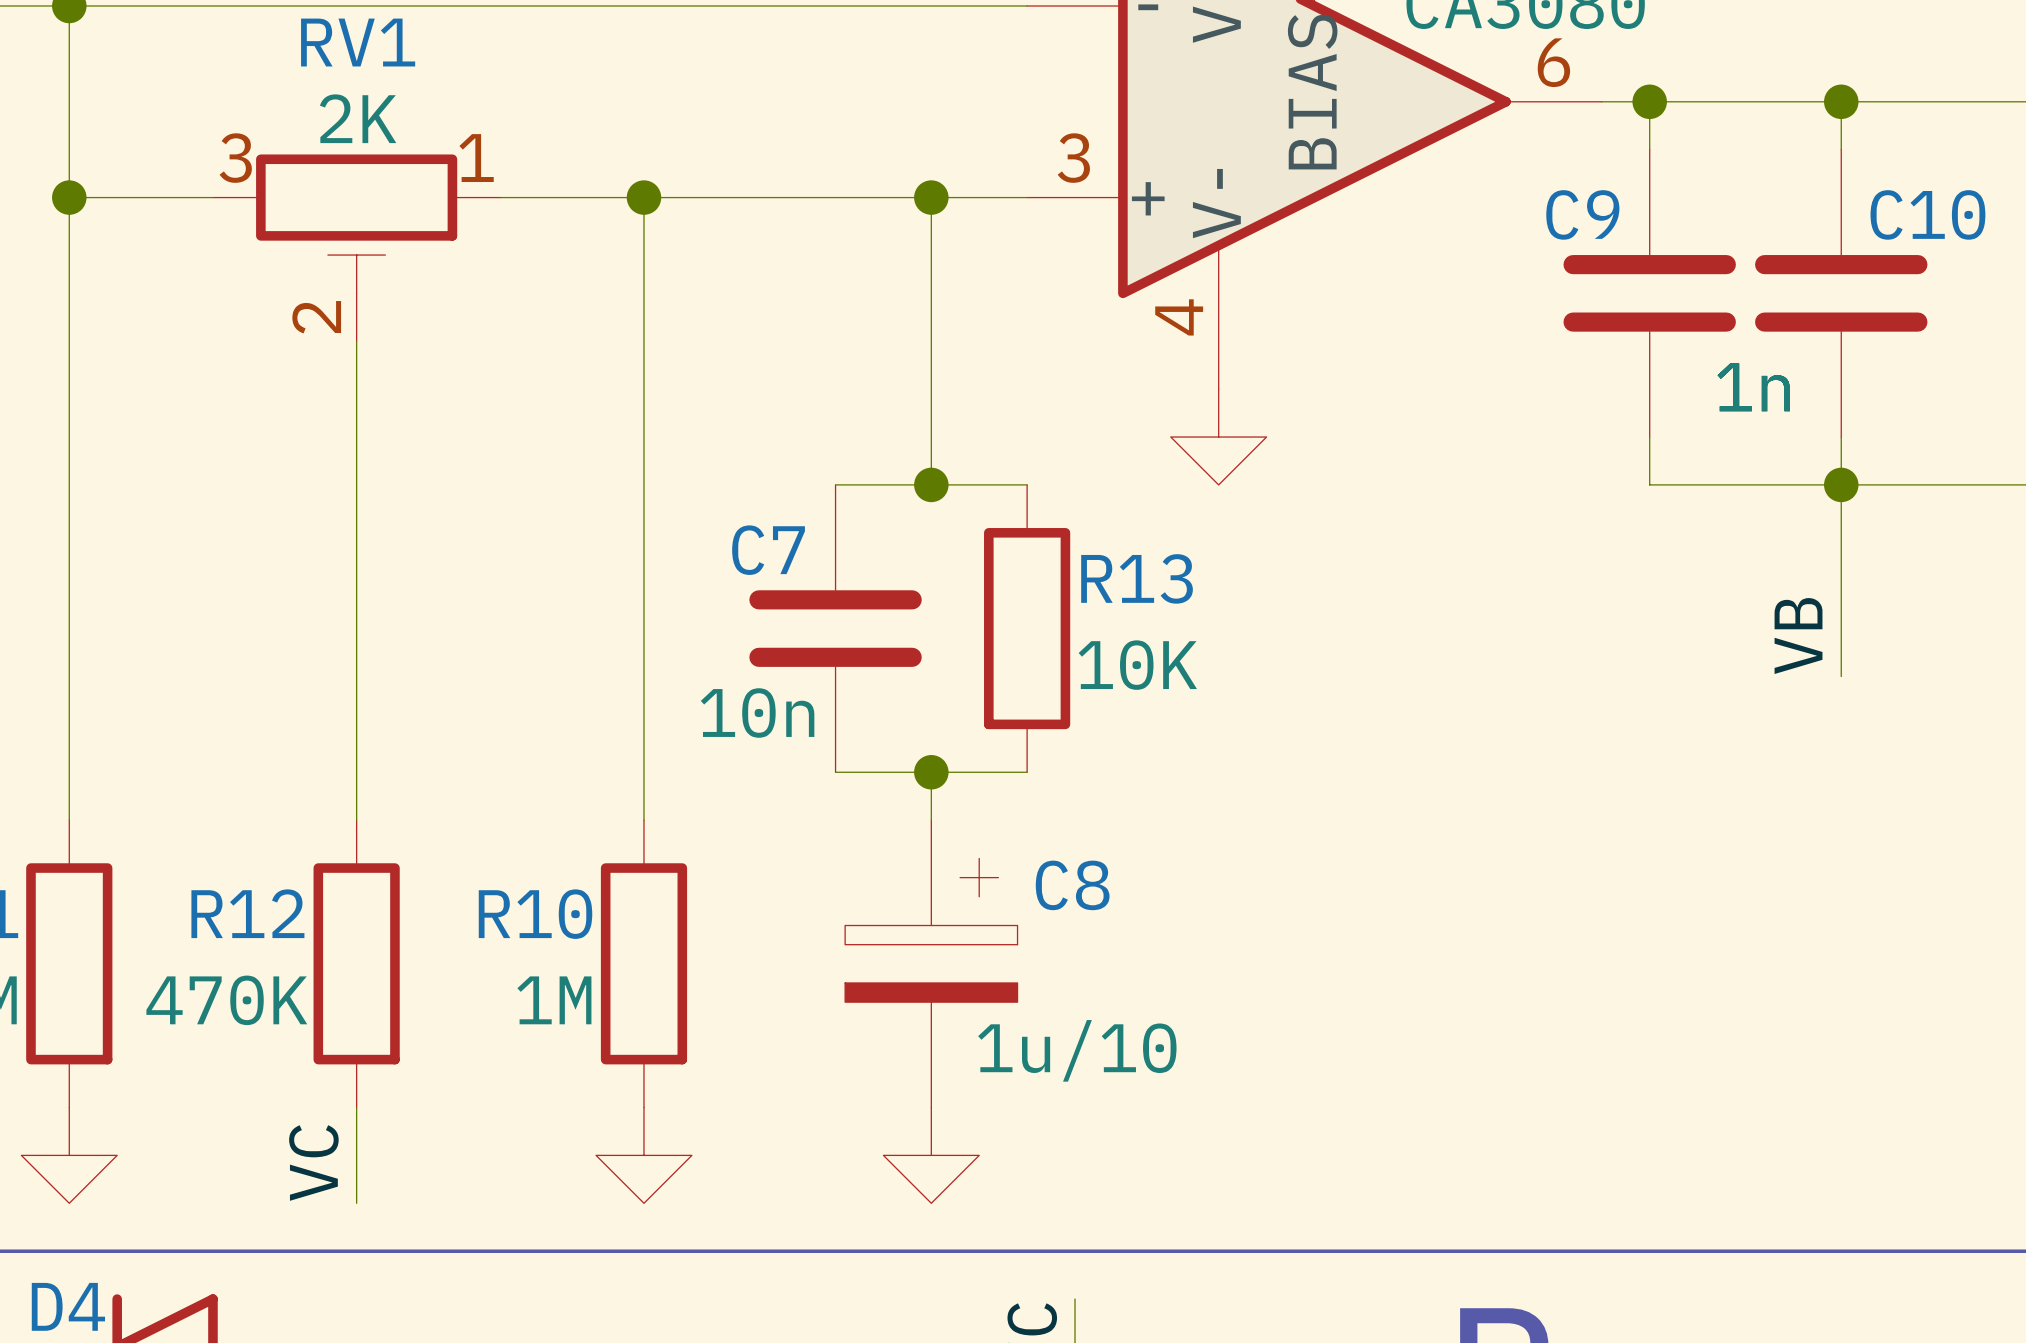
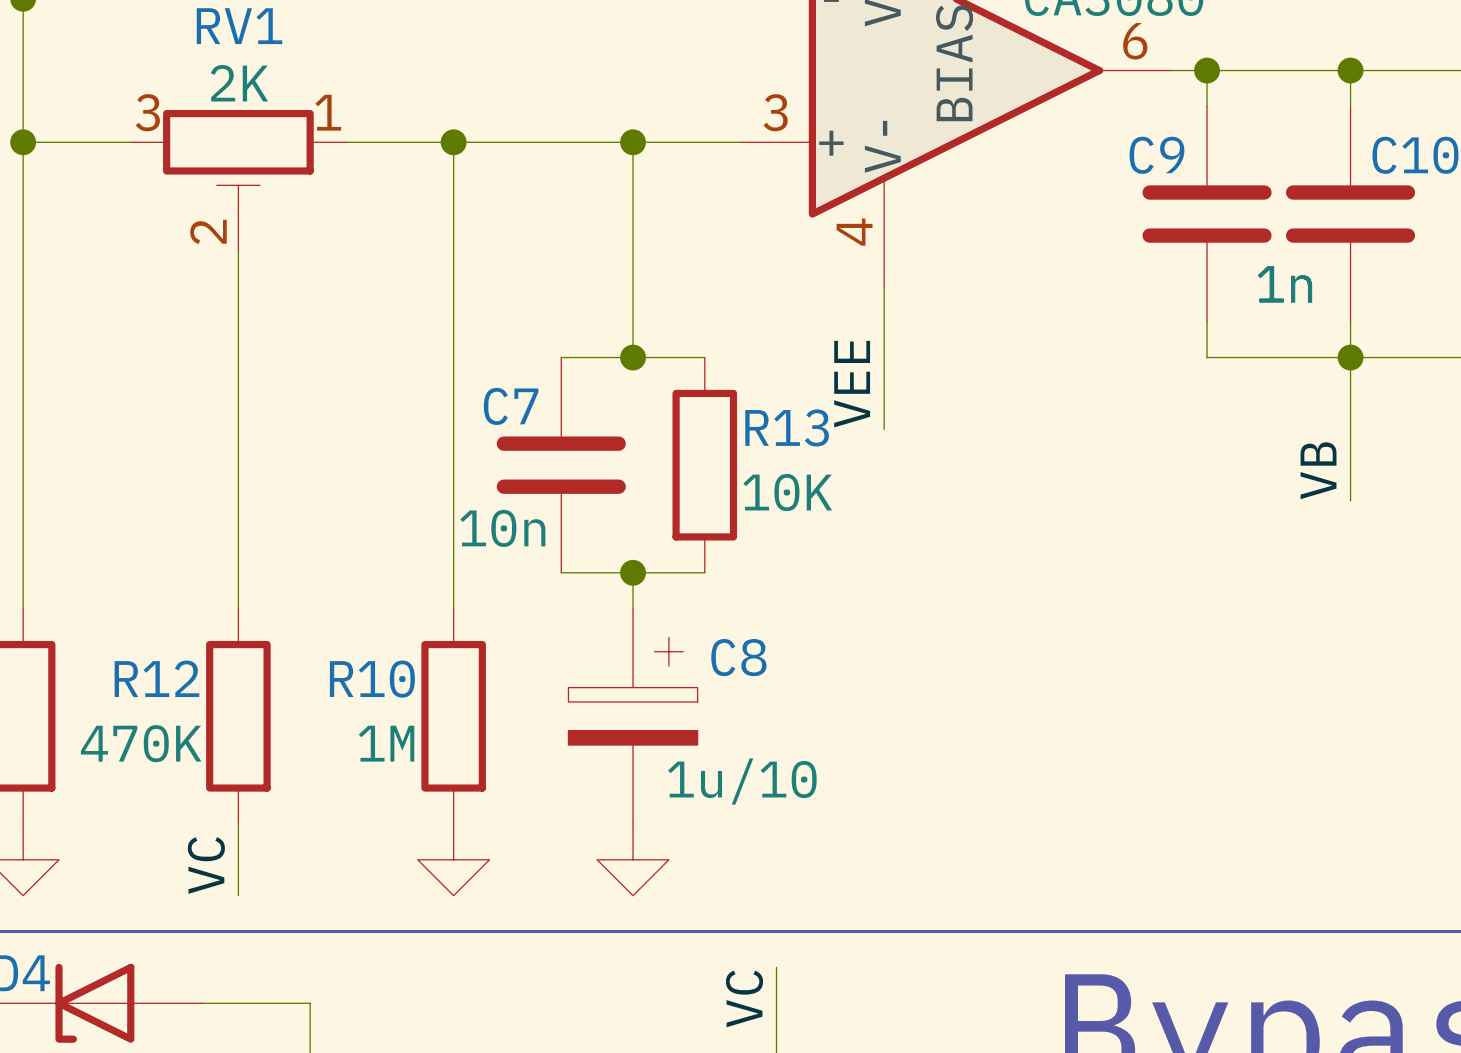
wire: (931, 197) (931, 484) -> (633, 142) (633, 357)
junction position: (931, 197) -> (633, 142)
wire: none -> (884, 285) (884, 429)
power symbol: (1218, 437) -> none
junction position: (931, 484) -> (633, 357)
wire: (979, 484) (1027, 484) -> (561, 357) (597, 357)
label: none -> VEE (852, 384)
C7 position: (835, 628) -> (561, 465)
R13 position: (1027, 628) -> (704, 465)
wire: (931, 772) (931, 820) -> (633, 572) (633, 608)
junction position: (931, 772) -> (633, 572)
wire: (979, 772) (1027, 772) -> (561, 572) (597, 572)
C8 position: (931, 963) -> (633, 716)
power symbol position: (931, 1155) -> (633, 859)

